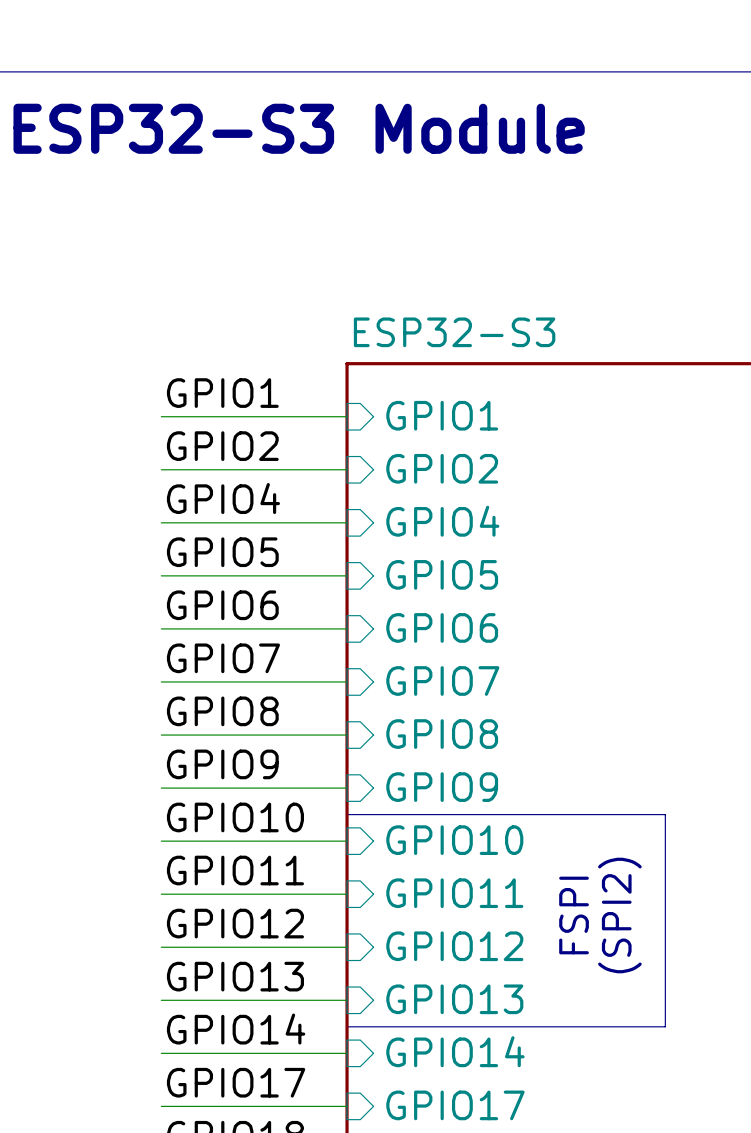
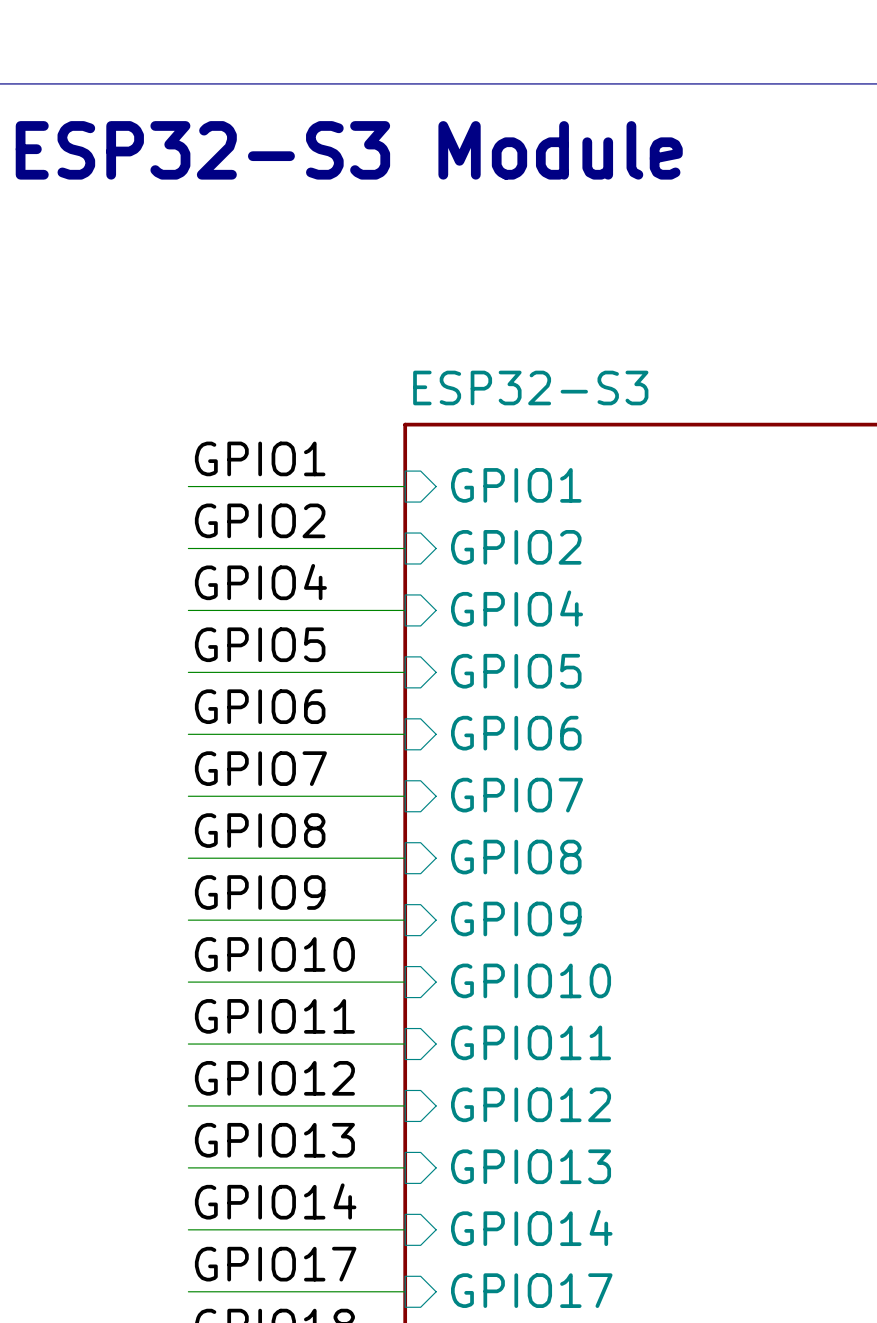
line: (347, 814) (665, 814) (665, 1026) (347, 1026) (347, 814) -> none
text: FSPI (574, 915) -> none
text: (SPI2) (619, 915) -> none

